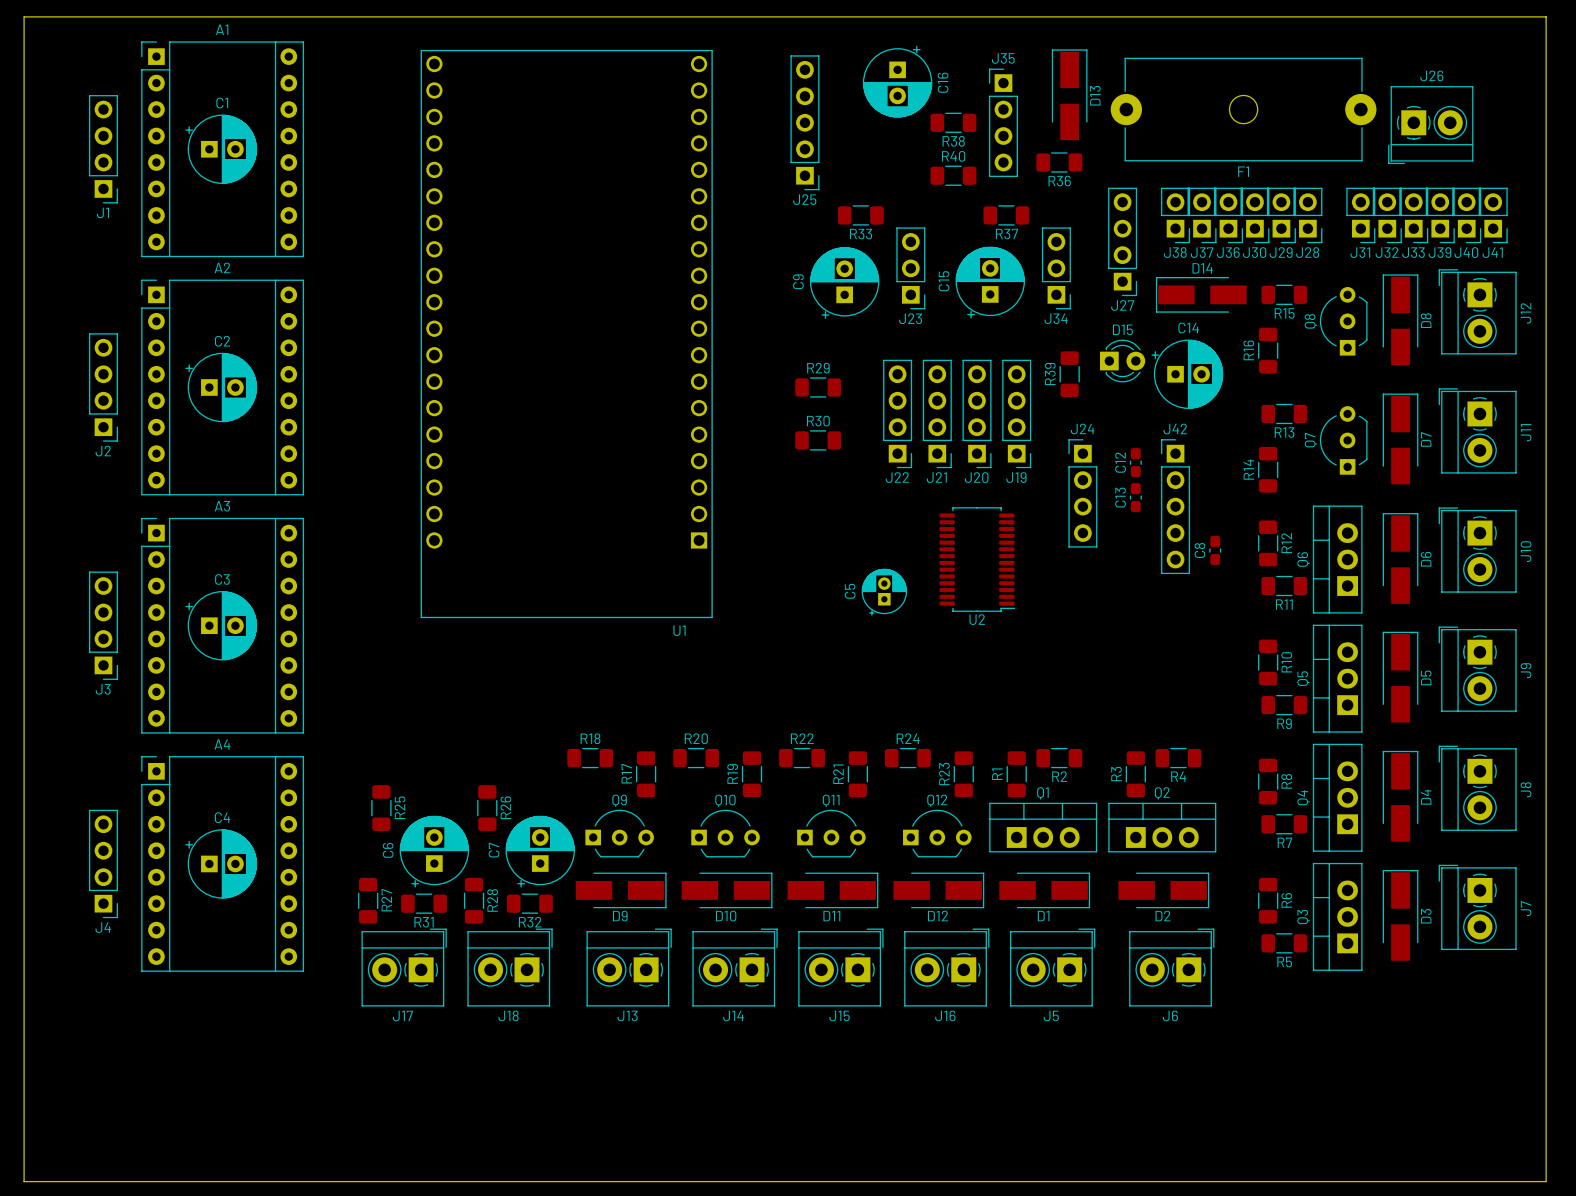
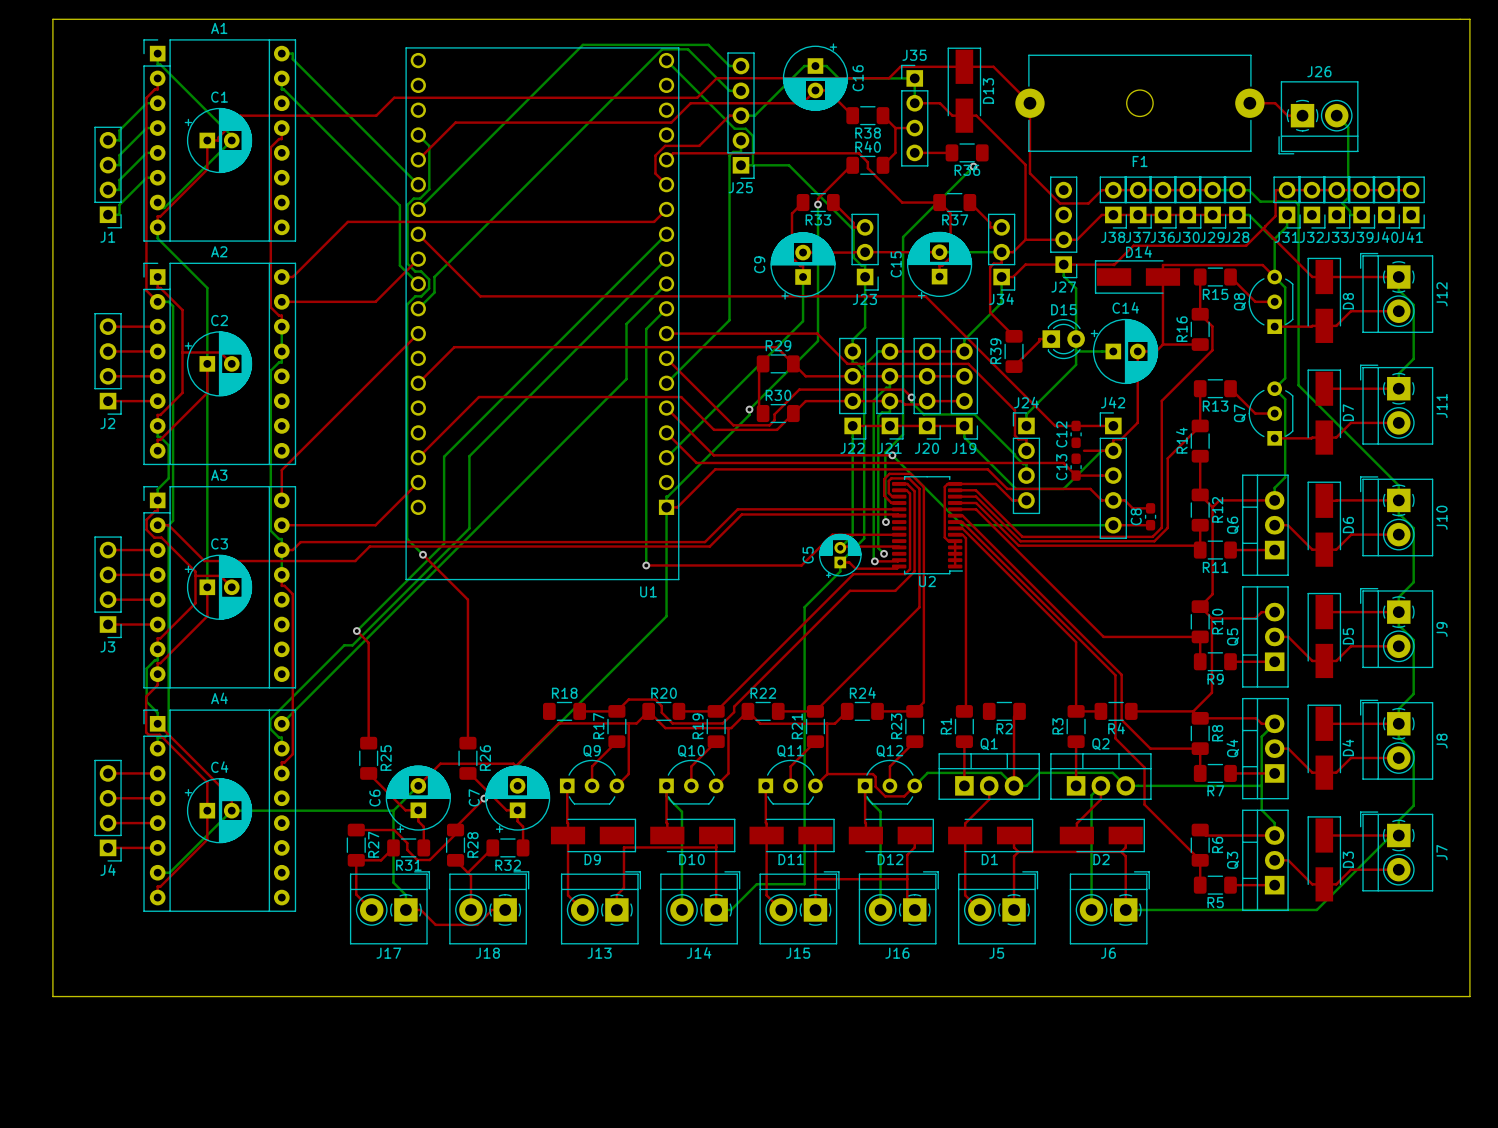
board edge: (24, 16) (1546, 16) (1546, 1181) (24, 1181) (24, 16) -> (52, 19) (52, 996) (1469, 996) (1469, 19) (52, 19)
bottom track: none -> (157, 53) (157, 64) (160, 64) (231, 135) (231, 140) (164, 208) (157, 208)
bottom track: none -> (281, 53) (292, 53) (292, 59) (418, 184)
bottom track: none -> (666, 60) (734, 128) (745, 128) (752, 135) (752, 165)
bottom track: none -> (741, 66) (729, 66) (708, 44) (582, 44) (418, 209)
C16 position: (897, 81) -> (815, 77)
top track: none -> (157, 78) (157, 89) (154, 89) (146, 97) (146, 290) (157, 301)
bottom track: none -> (281, 78) (281, 89) (399, 205) (399, 265) (418, 283)
D13 position: (1069, 94) -> (964, 90)
bottom track: none -> (741, 90) (729, 90) (688, 49) (662, 49) (434, 277) (434, 292) (418, 308)
bottom track: none -> (157, 103) (146, 103) (119, 130) (119, 140) (108, 140)
bottom track: none -> (914, 103) (914, 78) (838, 78) (826, 66) (804, 66) (754, 115) (741, 115)
top track: none -> (914, 103) (940, 103) (952, 115) (976, 115) (1025, 164) (1025, 239)
F1 position: (1243, 109) -> (1139, 103)
top track: none -> (1249, 103) (1275, 103) (1287, 115) (1302, 115)
top track: none -> (741, 115) (729, 115) (699, 145) (665, 145) (655, 155) (655, 173) (666, 184)
J25 position: (804, 122) -> (741, 115)
top track: none -> (852, 115) (827, 90) (815, 90) (802, 103) (690, 103) (671, 122) (455, 122) (418, 159)
top track: none -> (882, 115) (895, 128)
R38 position: (953, 122) -> (867, 115)
J35 position: (1003, 122) -> (914, 115)
bottom track: none -> (1336, 115) (1348, 127) (1348, 197) (1342, 203) (1350, 211) (1350, 214) (1361, 214)
J26 position: (1430, 125) -> (1318, 117)
bottom track: none -> (157, 128) (146, 128) (119, 155) (119, 165) (108, 165)
top track: none -> (281, 128) (281, 139) (279, 139) (270, 147) (270, 307) (279, 315) (281, 315) (281, 326)
top track: none -> (895, 128) (914, 128)
top track: none -> (895, 128) (895, 152) (882, 165)
bottom track: none -> (418, 135) (429, 146) (429, 189) (420, 198) (413, 198) (407, 204) (407, 263) (415, 271) (421, 271) (429, 279) (429, 288) (421, 296) (415, 296) (407, 304) (407, 538) (422, 554)
J1 position: (103, 149) -> (108, 177)
bottom track: none -> (741, 140) (741, 151) (733, 151) (729, 155) (729, 320) (666, 383)
bottom track: none -> (157, 152) (146, 152) (119, 180) (119, 189) (108, 189)
top track: none -> (914, 152) (951, 152)
R36 position: (1059, 162) -> (967, 152)
top track: none -> (666, 159) (673, 153) (858, 153) (867, 162) (867, 168) (902, 202) (939, 202) (950, 213) (950, 257) (942, 265) (939, 265) (939, 276)
bottom track: none -> (741, 165) (789, 165) (853, 229) (853, 257) (861, 265) (865, 265) (865, 327) (852, 339) (852, 362) (856, 362) (864, 370) (864, 538) (840, 562) (840, 571) (804, 607) (804, 884) (756, 884) (731, 909) (716, 909)
top track: none -> (852, 165) (818, 198) (818, 204)
R40 position: (953, 175) -> (867, 165)
bottom track: none -> (973, 166) (903, 237) (903, 434) (885, 452) (885, 522)
via: none -> (973, 166)
bottom track: none -> (157, 177) (146, 177) (119, 204) (119, 214) (108, 214)
bottom track: none -> (1212, 190) (1248, 190) (1260, 201) (1295, 201) (1298, 204) (1298, 385) (1398, 485) (1398, 515) (1413, 528) (1413, 582) (1398, 597) (1398, 627) (1413, 640) (1413, 693) (1398, 708) (1398, 738) (1413, 751) (1413, 805) (1398, 820) (1398, 835)
top track: none -> (1212, 190) (1101, 190) (1088, 203) (1060, 203) (1029, 173) (1029, 103) (993, 66) (900, 66) (889, 78) (716, 78) (697, 97) (394, 97) (376, 115) (240, 115) (218, 137) (218, 140) (207, 140) (207, 169) (160, 216) (157, 216) (157, 227)
top track: none -> (1411, 190) (1275, 190) (1275, 216) (1246, 245) (1133, 245) (1114, 265) (1025, 264) (1013, 277) (1001, 277)
top track: none -> (803, 202) (792, 213) (792, 257) (800, 266) (803, 266) (803, 277)
top track: none -> (833, 202) (853, 222) (853, 227) (865, 227)
top track: none -> (969, 202) (990, 222) (990, 227) (1001, 227)
bottom track: none -> (818, 204) (818, 341) (749, 409) (749, 414) (666, 496) (666, 616) (484, 798)
via: none -> (818, 204)
top track: none -> (666, 209) (654, 221) (347, 221) (292, 277) (281, 277)
bottom track: none -> (1237, 214) (1248, 214) (1274, 238)
top track: none -> (1237, 214) (1101, 214) (1077, 239) (1025, 239)
bottom track: none -> (1287, 214) (1287, 226) (1274, 238)
bottom track: none -> (157, 227) (157, 238) (207, 288) (207, 587)
top track: none -> (1263, 228) (1312, 277) (1398, 277)
top track: none -> (418, 234) (480, 296) (925, 296) (1055, 425) (1113, 425)
bottom track: none -> (666, 234) (444, 456) (444, 543) (356, 631)
bottom track: none -> (1274, 238) (1274, 277) (1285, 287) (1285, 378) (1274, 388) (1285, 399) (1285, 477) (1274, 487) (1274, 500)
top track: none -> (1025, 239) (1013, 252) (1001, 252) (1001, 263) (993, 263) (990, 267) (990, 312) (1014, 336)
bottom track: none -> (939, 252) (1001, 252)
top track: none -> (939, 252) (803, 252)
top track: none -> (418, 259) (375, 301) (281, 301)
bottom track: none -> (666, 259) (469, 456) (469, 528) (352, 645) (344, 645) (270, 719) (270, 728) (279, 737) (281, 737) (281, 748)
bottom track: none -> (1063, 264) (1063, 276) (1076, 288) (1076, 364) (1026, 414) (1026, 425)
top track: none -> (157, 277) (157, 288) (160, 288) (182, 310) (182, 392) (160, 414) (157, 414) (157, 425)
bottom track: none -> (803, 277) (803, 321) (666, 457)
bottom track: none -> (1001, 277) (1001, 302) (964, 339) (964, 351)
top track: none -> (1200, 277) (1200, 314) (1212, 326) (1212, 350) (1161, 400) (1161, 527) (1152, 536) (1022, 536) (975, 490) (955, 490)
top track: none -> (1230, 277) (1255, 301) (1274, 301)
top track: none -> (1274, 277) (1262, 265) (1162, 265) (1162, 344)
bottom track: none -> (1398, 277) (1398, 291) (1413, 304) (1413, 358) (1398, 373) (1398, 388)
bottom track: none -> (666, 283) (626, 323) (626, 379) (281, 723)
bottom track: none -> (157, 301) (168, 301) (173, 306) (173, 520) (168, 525)
bottom track: none -> (666, 308) (646, 329) (646, 565)
top track: none -> (1398, 311) (1350, 311) (1336, 325) (1274, 326)
top track: none -> (108, 326) (157, 326)
bottom track: none -> (281, 326) (281, 362) (279, 362) (270, 370) (270, 530) (279, 539) (281, 539) (281, 574)
top track: none -> (418, 333) (281, 470) (281, 500)
top track: none -> (666, 333) (817, 333) (847, 363) (968, 363) (1014, 410) (1014, 435) (1018, 439) (1026, 439) (1026, 450)
top track: none -> (1051, 339) (1039, 339) (1039, 341) (1014, 366)
top track: none -> (1162, 344) (1156, 351) (1137, 351) (1137, 422) (1121, 439) (1113, 439) (1113, 450) (1084, 450)
top track: none -> (1162, 344) (1200, 344)
top track: none -> (108, 351) (157, 351)
bottom track: none -> (889, 351) (878, 351) (861, 368)
top track: none -> (889, 351) (964, 351)
bottom track: none -> (1076, 351) (1113, 351)
top track: none -> (182, 352) (220, 352) (231, 363)
top track: none -> (666, 358) (733, 425) (769, 425) (774, 420) (774, 414) (799, 389) (903, 389) (911, 397)
top track: none -> (207, 363) (207, 392) (160, 439) (157, 439) (157, 450)
top track: none -> (763, 363) (759, 367) (759, 409) (763, 413)
top track: none -> (108, 376) (157, 376)
bottom track: none -> (889, 376) (889, 387) (886, 387) (873, 400) (874, 561)
top track: none -> (964, 376) (805, 376) (776, 347) (454, 347) (418, 383)
top track: none -> (1200, 388) (1200, 425) (1167, 458) (1167, 527) (1154, 541) (1020, 541) (976, 496) (955, 496)
top track: none -> (1230, 388) (1255, 413) (1274, 413)
top track: none -> (1324, 388) (1398, 388)
bottom track: none -> (911, 397) (911, 402) (923, 414) (974, 414) (1023, 464) (1026, 464) (1026, 475)
via: none -> (911, 397)
top track: none -> (108, 401) (157, 401)
bottom track: none -> (889, 401) (889, 412) (882, 412) (878, 416) (878, 548) (884, 553)
top track: none -> (964, 401) (927, 401) (923, 404) (904, 404) (901, 401) (805, 401) (777, 429) (714, 429) (681, 397) (478, 397) (418, 457)
top track: none -> (666, 408) (713, 455) (892, 455)
via: none -> (749, 409)
top track: none -> (1398, 422) (1350, 422) (1336, 437) (1274, 438)
bottom track: none -> (157, 425) (157, 436) (160, 436) (168, 445) (168, 478) (157, 489) (157, 500)
bottom track: none -> (852, 425) (852, 535) (840, 547)
top track: none -> (852, 425) (964, 425)
bottom track: none -> (964, 425) (964, 437) (1015, 488) (1063, 488) (1101, 450) (1113, 450)
top track: none -> (666, 432) (696, 462) (1063, 462) (1076, 475) (1113, 475)
bottom track: none -> (892, 455) (962, 525) (1113, 525)
via: none -> (892, 455)
top track: none -> (1200, 456) (1200, 494) (1212, 507)
top track: none -> (418, 482) (375, 525) (281, 525)
top track: none -> (899, 483) (907, 483) (914, 491) (914, 571) (895, 590) (849, 590) (734, 706) (734, 712) (722, 723) (672, 723) (661, 712) (661, 706) (655, 699) (628, 699) (616, 711) (579, 711)
top track: none -> (899, 490) (906, 490) (910, 493) (910, 569) (905, 574) (853, 574) (716, 711) (678, 711)
top track: none -> (899, 496) (892, 496) (888, 493) (888, 480) (891, 478) (908, 478) (919, 488) (919, 607) (815, 711) (778, 711)
top track: none -> (157, 500) (157, 511) (154, 511) (146, 519) (146, 529) (154, 537) (161, 537) (195, 571) (195, 603) (160, 638) (157, 638) (157, 649)
top track: none -> (1026, 500) (1012, 500) (995, 483) (947, 483) (944, 486) (944, 537) (948, 541) (955, 541) (955, 566)
top track: none -> (1274, 500) (1219, 500) (1212, 507)
top track: none -> (1398, 500) (1324, 500)
top track: none -> (899, 502) (891, 502) (884, 495) (884, 479) (889, 473) (910, 473) (923, 486) (923, 702) (914, 711) (877, 711)
top track: none -> (955, 502) (976, 502) (1018, 545) (1200, 545)
top track: none -> (666, 507) (677, 507) (715, 469) (987, 469) (1007, 488) (1090, 488) (1101, 500) (1124, 500) (1132, 508) (1150, 508)
top track: none -> (1212, 507) (1212, 594) (1200, 606) (1211, 618)
top track: none -> (899, 509) (737, 509) (704, 542) (300, 542) (292, 550) (281, 550)
top track: none -> (955, 509) (976, 509) (1103, 636) (1200, 636) (1200, 661)
top track: none -> (899, 515) (741, 514) (709, 546) (369, 546) (355, 561) (204, 561) (168, 525) (157, 525)
top track: none -> (955, 515) (962, 515) (1121, 674) (1121, 719) (1150, 748) (1200, 748) (1200, 773)
via: none -> (885, 522)
top track: none -> (955, 522) (962, 522) (1115, 675) (1115, 738) (1144, 767) (1144, 804) (1200, 860) (1200, 885)
bottom track: none -> (168, 525) (168, 733) (164, 737) (157, 737) (157, 748)
top track: none -> (1113, 525) (1150, 525)
top track: none -> (1200, 525) (1200, 550)
top track: none -> (1274, 525) (1287, 525) (1312, 549) (1336, 549) (1351, 534) (1398, 534)
top track: none -> (955, 528) (962, 528) (1076, 642) (1076, 711) (1100, 711)
top track: none -> (899, 534) (832, 534) (801, 565) (646, 565)
top track: none -> (955, 534) (962, 534) (965, 538) (965, 711)
top track: none -> (899, 546) (840, 547)
top track: none -> (108, 550) (157, 550)
top track: none -> (1230, 550) (1274, 550)
via: none -> (884, 553)
top track: none -> (422, 554) (467, 599) (467, 743)
via: none -> (422, 554)
top track: none -> (899, 560) (874, 561)
via: none -> (874, 561)
top track: none -> (840, 562) (849, 562) (855, 568) (897, 568) (899, 566)
via: none -> (646, 565)
top track: none -> (108, 574) (157, 574)
top track: none -> (281, 574) (281, 585) (284, 585) (292, 594) (292, 754) (284, 762) (281, 762) (281, 773)
top track: none -> (195, 575) (220, 575) (231, 587)
top track: none -> (207, 587) (207, 616) (160, 663) (157, 663) (157, 685) (146, 696) (146, 732) (148, 734) (159, 734) (207, 782) (207, 839) (160, 886) (157, 886) (157, 897)
top track: none -> (108, 599) (157, 599)
top track: none -> (1274, 612) (1261, 612) (1255, 618) (1211, 618)
top track: none -> (1324, 612) (1398, 612)
top track: none -> (1211, 618) (1211, 692) (1193, 711)
top track: none -> (108, 624) (157, 624)
top track: none -> (356, 631) (368, 642) (368, 743)
via: none -> (356, 631)
top track: none -> (1274, 636) (1288, 636) (1312, 660) (1336, 660) (1350, 646) (1398, 646)
bottom track: none -> (157, 649) (157, 660) (154, 660) (146, 668) (146, 701) (157, 712) (157, 723)
top track: none -> (1230, 661) (1274, 661)
top track: none -> (847, 711) (834, 723) (760, 723) (747, 711) (731, 728) (665, 728) (648, 711) (636, 723) (559, 722) (515, 766) (513, 763) (440, 763) (418, 785)
top track: none -> (1019, 711) (1014, 716) (1014, 785)
top track: none -> (1131, 711) (1193, 711)
top track: none -> (1193, 711) (1200, 718) (1256, 718) (1261, 723) (1274, 723)
top track: none -> (628, 723) (628, 773) (616, 785)
top track: none -> (157, 723) (231, 797) (231, 810)
top track: none -> (827, 723) (827, 774)
bottom track: none -> (1274, 723) (1261, 736) (1261, 810) (1274, 823) (1274, 835)
top track: none -> (1324, 723) (1398, 723)
top track: none -> (728, 728) (728, 773) (716, 785)
top track: none -> (616, 741) (592, 766) (592, 785)
top track: none -> (716, 741) (691, 766) (691, 785)
top track: none -> (815, 741) (790, 766) (790, 785)
top track: none -> (914, 741) (889, 766) (889, 785)
top track: none -> (964, 741) (964, 785)
top track: none -> (1076, 741) (1076, 785)
top track: none -> (1274, 748) (1288, 748) (1312, 772) (1336, 772) (1350, 758) (1398, 758)
top track: none -> (108, 773) (157, 773)
top track: none -> (368, 773) (405, 810) (418, 810) (418, 821) (423, 826) (423, 847)
top track: none -> (467, 773) (506, 810) (517, 810) (517, 821) (523, 826) (523, 847)
top track: none -> (827, 774) (815, 785)
top track: none -> (827, 774) (872, 774) (875, 776) (875, 786) (885, 796) (904, 796) (914, 785)
top track: none -> (1230, 773) (1274, 773)
bottom track: none -> (418, 785) (393, 810)
top track: none -> (567, 785) (568, 895) (582, 909)
bottom track: none -> (666, 785) (666, 796) (681, 811) (681, 909)
top track: none -> (666, 785) (667, 835)
top track: none -> (765, 785) (766, 895) (781, 909)
bottom track: none -> (865, 785) (865, 796) (880, 811) (880, 909)
top track: none -> (865, 785) (865, 835)
bottom track: none -> (914, 785) (927, 772) (1001, 772) (1014, 785) (1026, 785) (1039, 772) (1112, 772) (1125, 785) (1261, 785)
top track: none -> (989, 785) (989, 799) (965, 823) (965, 895) (979, 909)
bottom track: none -> (1100, 785) (1091, 795) (1091, 909)
top track: none -> (1100, 785) (1100, 799) (1076, 823) (1076, 835)
top track: none -> (108, 798) (157, 798)
top track: none -> (484, 798) (455, 827) (455, 834) (429, 859) (417, 859) (407, 849) (407, 843) (394, 830) (356, 830)
via: none -> (484, 798)
bottom track: none -> (393, 810) (231, 810) (169, 872) (157, 872)
bottom track: none -> (393, 810) (393, 882) (405, 895) (405, 909)
top track: none -> (108, 823) (157, 823)
bottom track: none -> (1398, 828) (1316, 909) (1125, 909)
top track: none -> (1200, 830) (1205, 835) (1274, 835)
top track: none -> (716, 835) (716, 909)
top track: none -> (815, 835) (815, 909)
top track: none -> (914, 835) (914, 847) (907, 854) (907, 909) (914, 909)
top track: none -> (1014, 835) (1014, 847) (1018, 851)
top track: none -> (1125, 835) (1125, 847) (1121, 851)
top track: none -> (1324, 835) (1398, 835)
top track: none -> (108, 847) (157, 847)
top track: none -> (393, 847) (381, 860) (356, 860) (356, 894) (371, 909)
top track: none -> (492, 847) (467, 872)
top track: none -> (716, 847) (623, 847) (623, 887) (616, 895) (616, 909)
top track: none -> (1018, 851) (1121, 851)
top track: none -> (1018, 851) (1014, 856) (1014, 909)
top track: none -> (1121, 851) (1125, 856) (1125, 909)
top track: none -> (455, 860) (470, 875) (470, 909)
top track: none -> (1274, 860) (1288, 860) (1312, 884) (1336, 884) (1350, 869) (1398, 869)
top track: none -> (815, 879) (907, 879)
top track: none -> (1230, 885) (1274, 885)
top track: none -> (405, 909) (420, 909) (435, 924) (477, 924) (490, 909) (505, 909)

